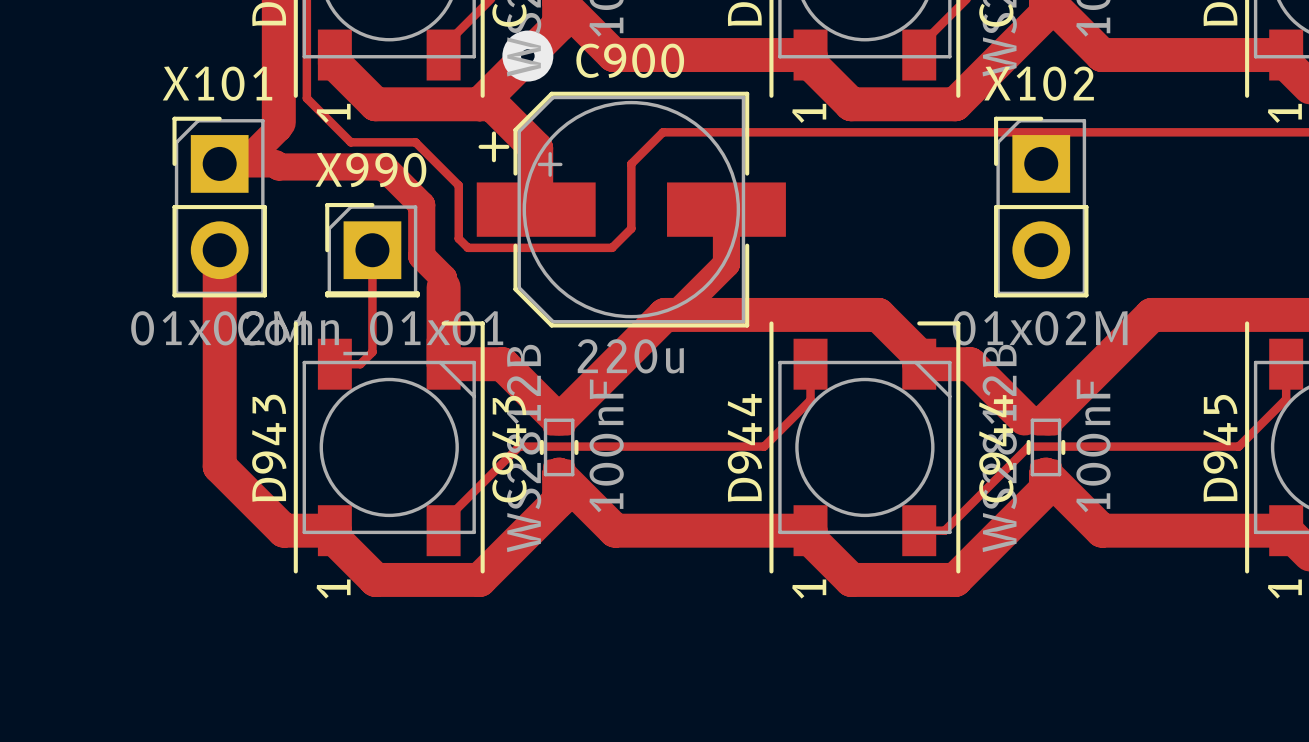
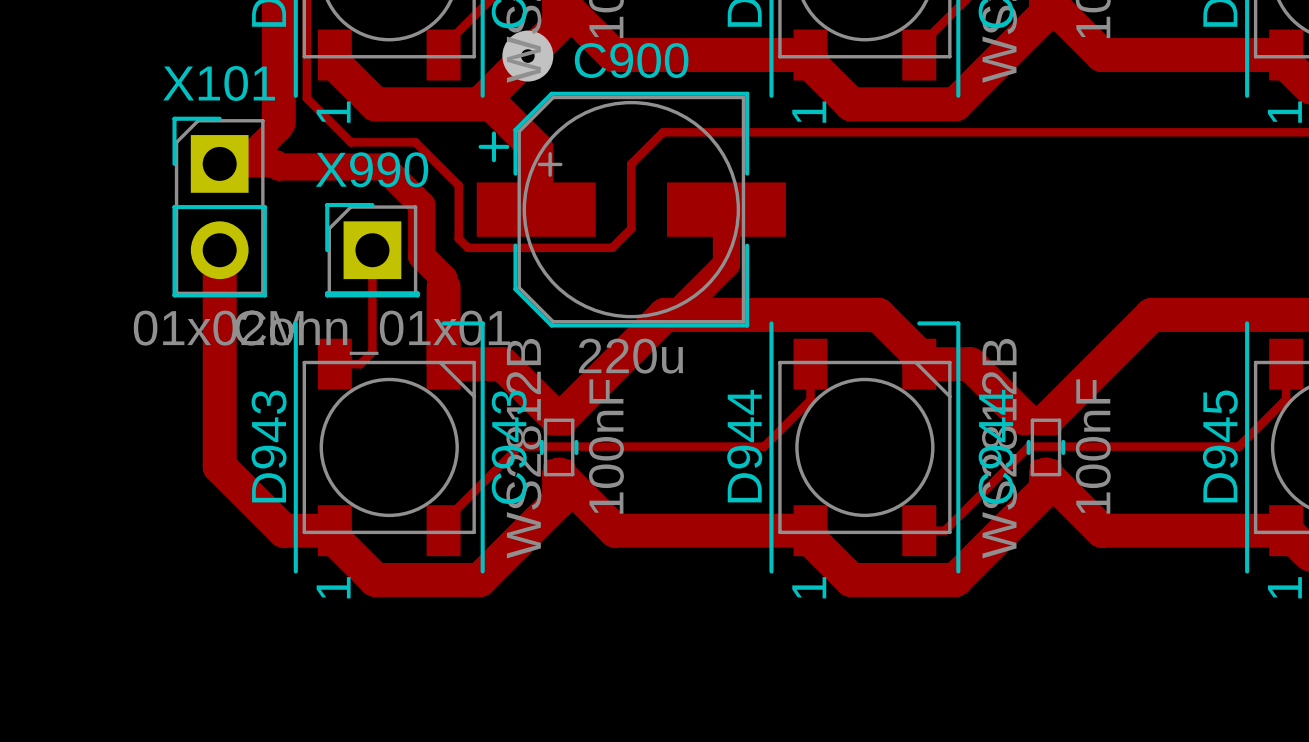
X102: 01x02M (1041, 207) -> none

